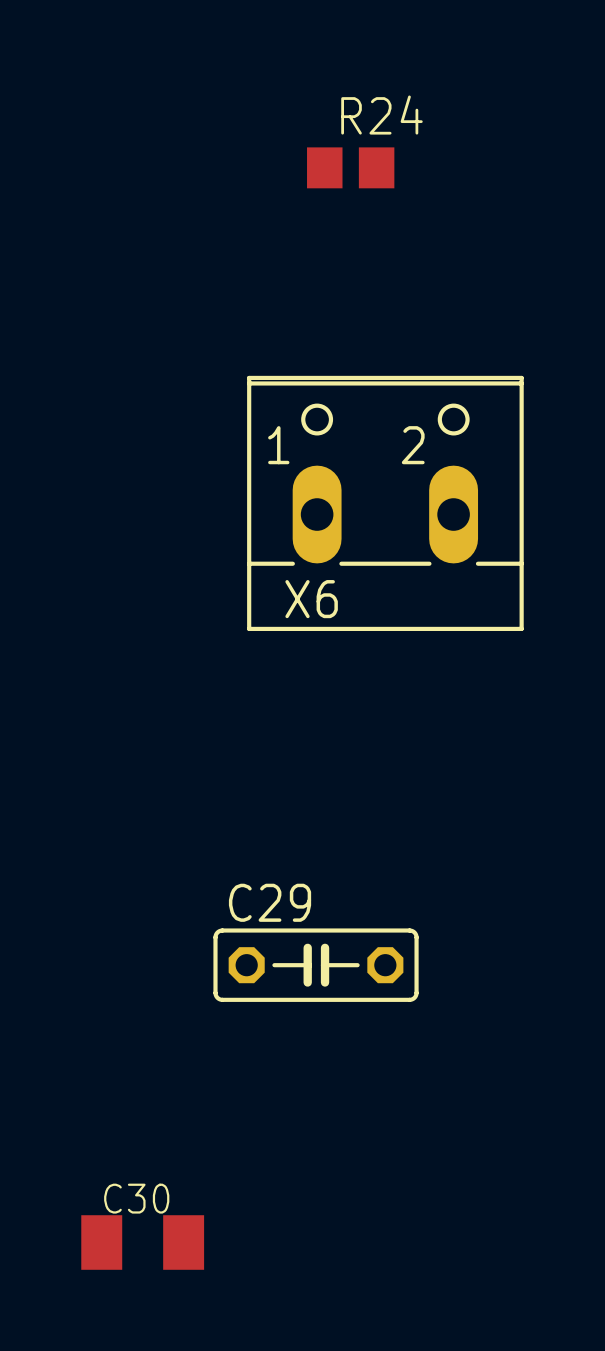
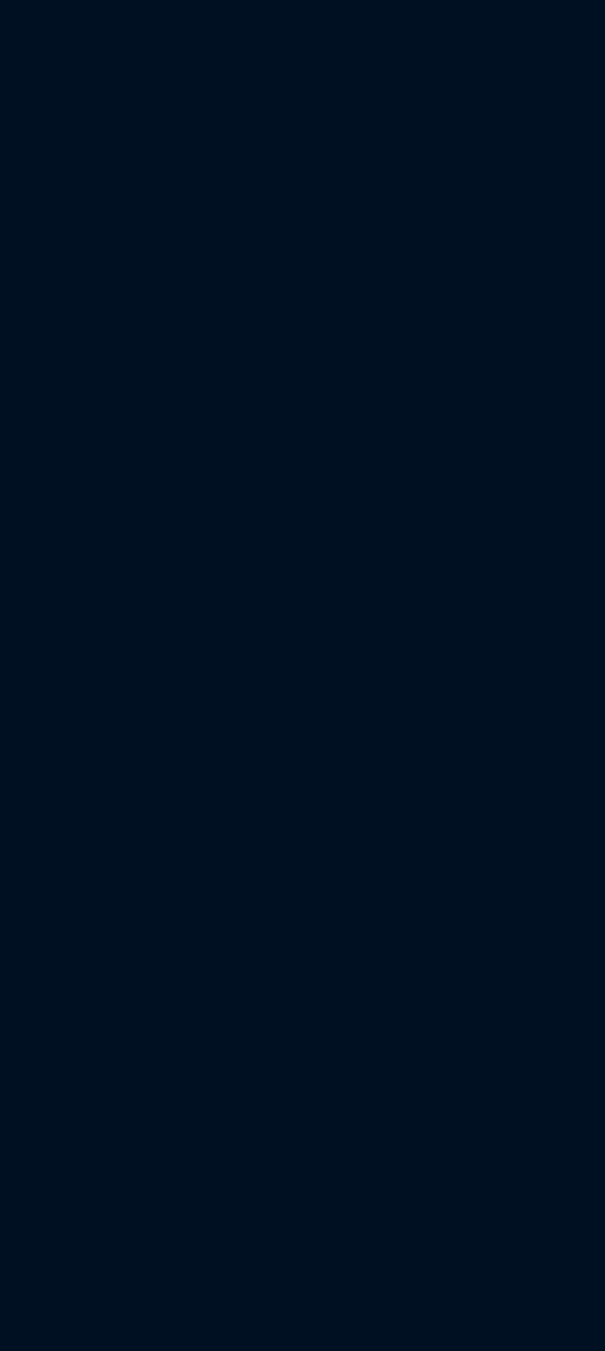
R24: (350, 167) -> none
X6: (385, 503) -> none
C29: (316, 965) -> none
C30: (142, 1242) -> none

